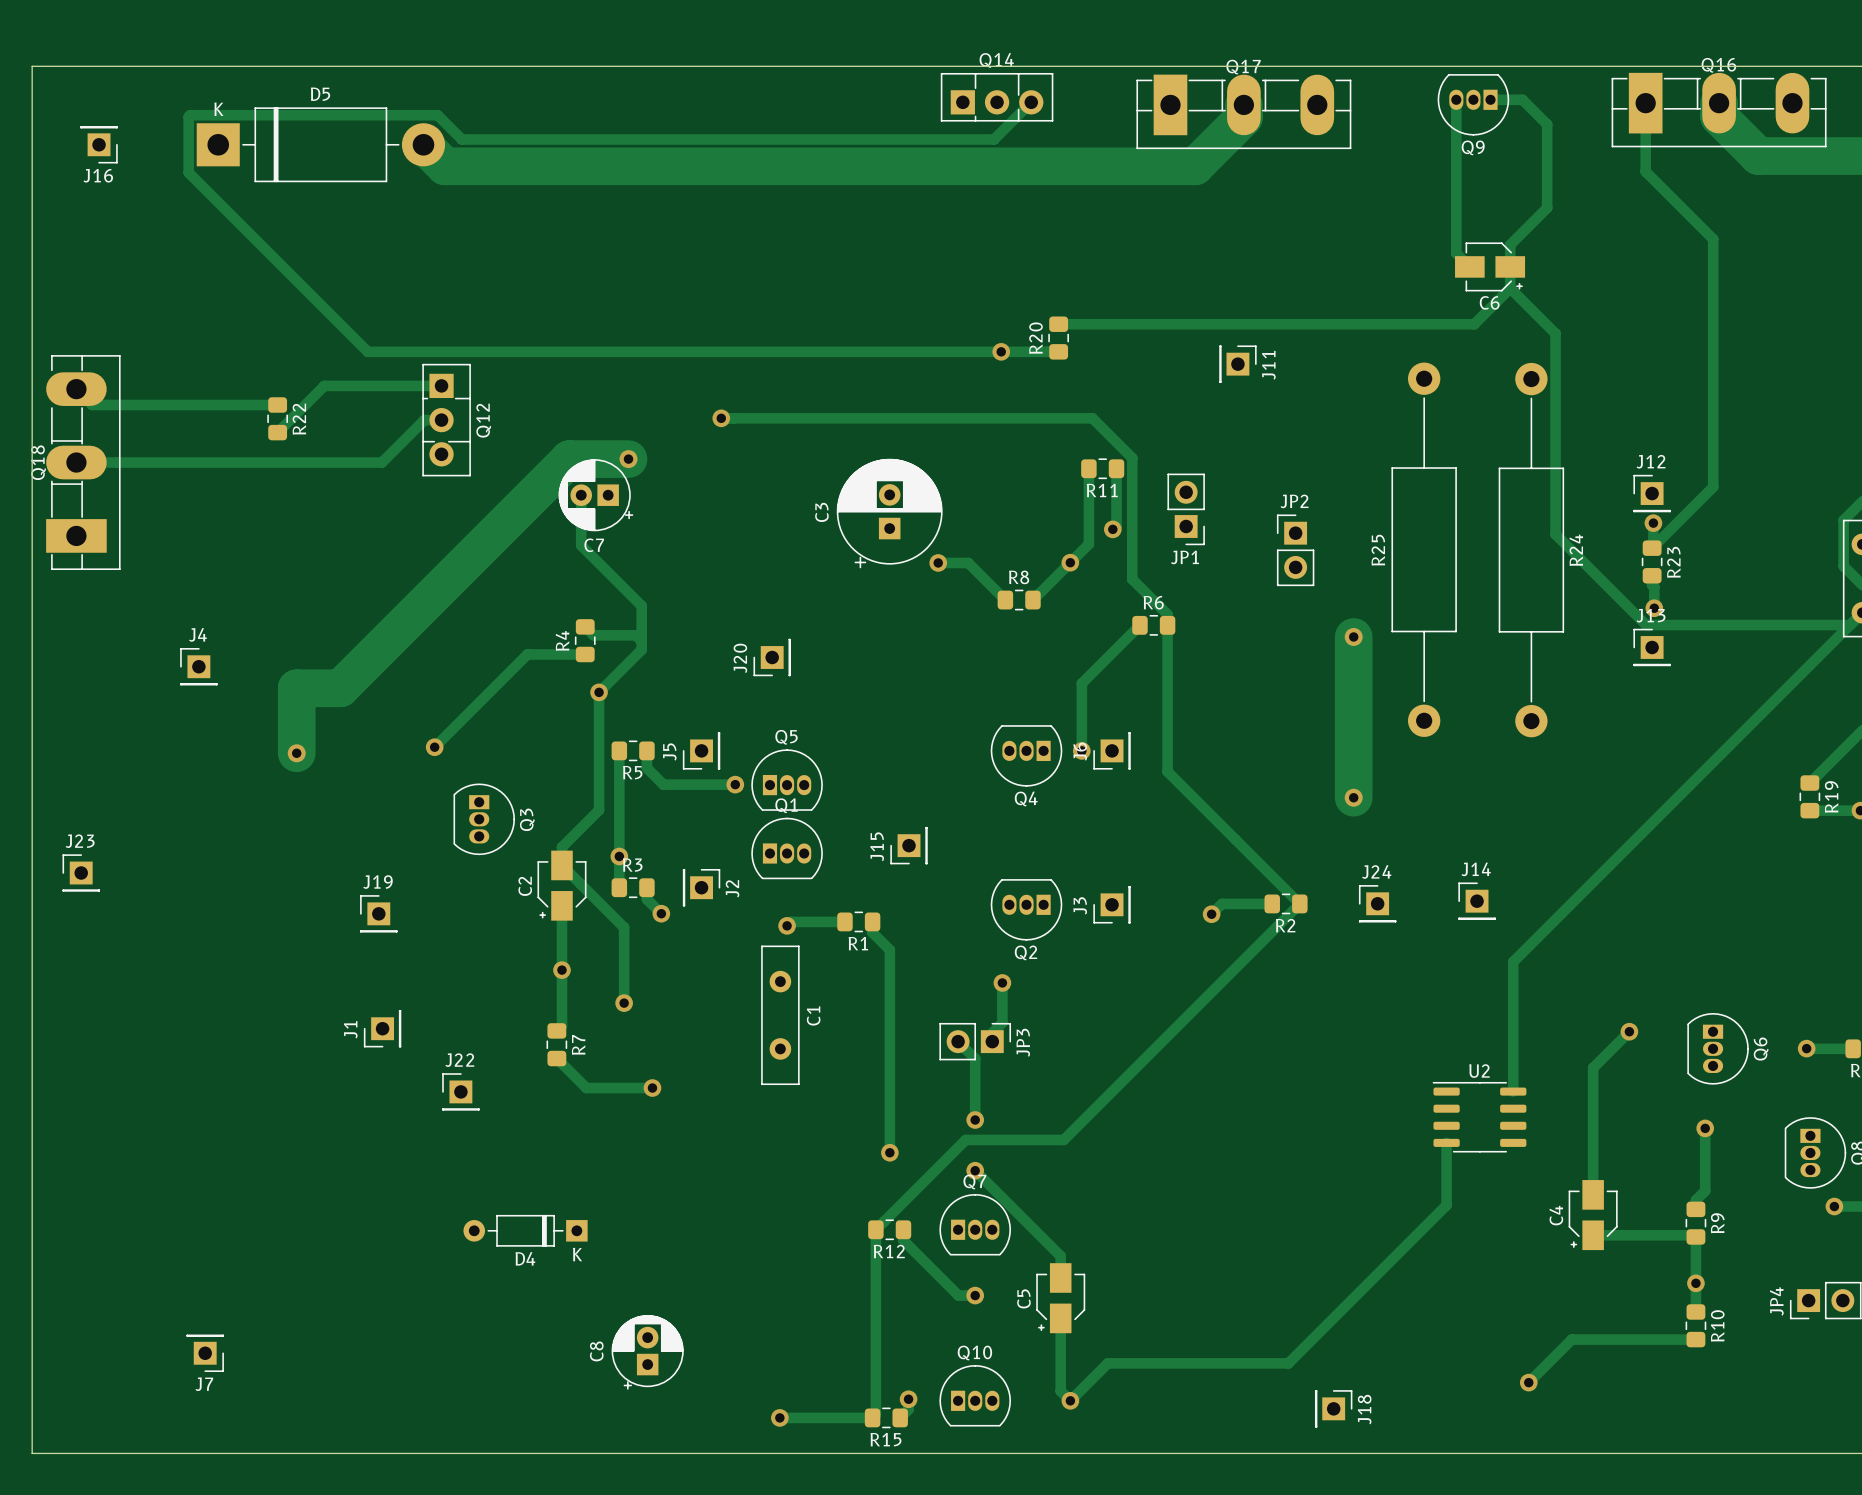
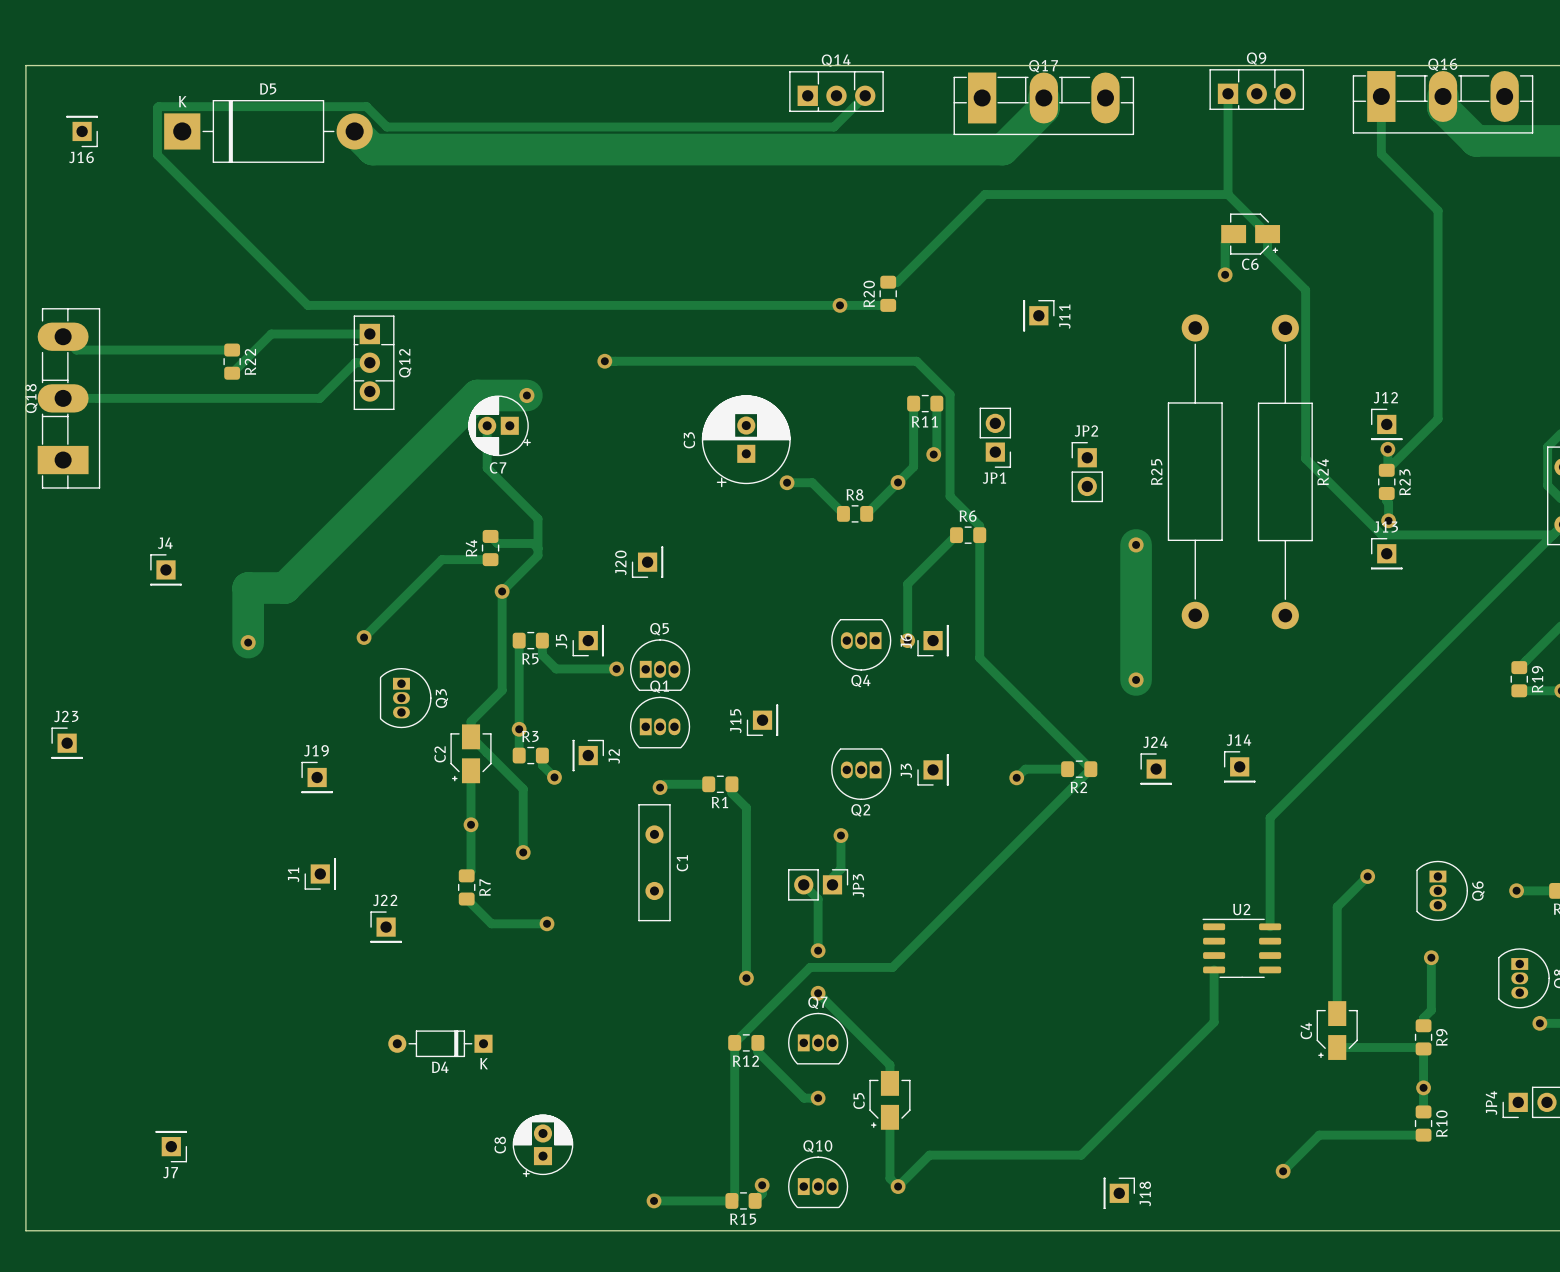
Q9 footprint: [1437, 74, 1510, 136] -> [1209, 69, 1305, 110]
track: (1456, 99) (1456, 253) (1469, 266) -> (1225, 274) (1225, 242) (1233, 234)
track: none -> (1228, 93) (1228, 194)
track: (1490, 99) (1522, 99) (1547, 124) (1547, 207) (1510, 244) (1510, 266) -> (1228, 194) (1267, 234)
Q9 name position: Q9 (1473, 147) -> Q9 (1256, 58)
track: (1510, 288) (1474, 324) (1069, 324) -> (1228, 194) (984, 194) (897, 282)
via: none -> (1225, 274)

